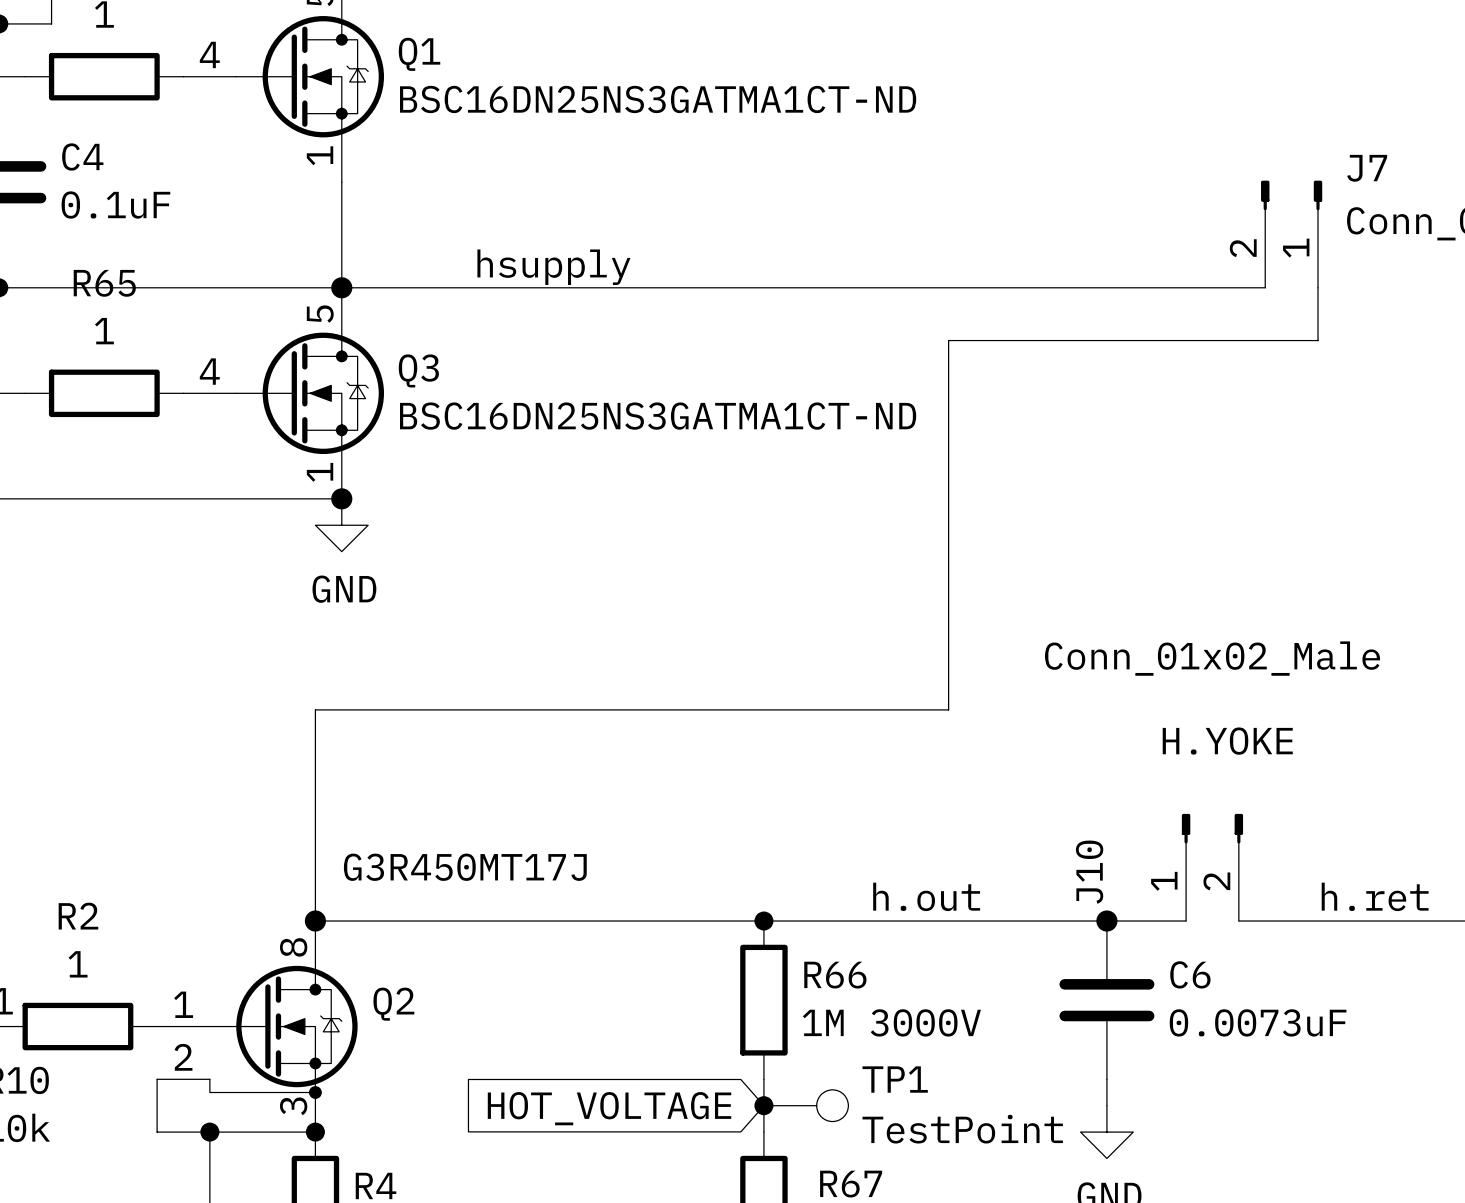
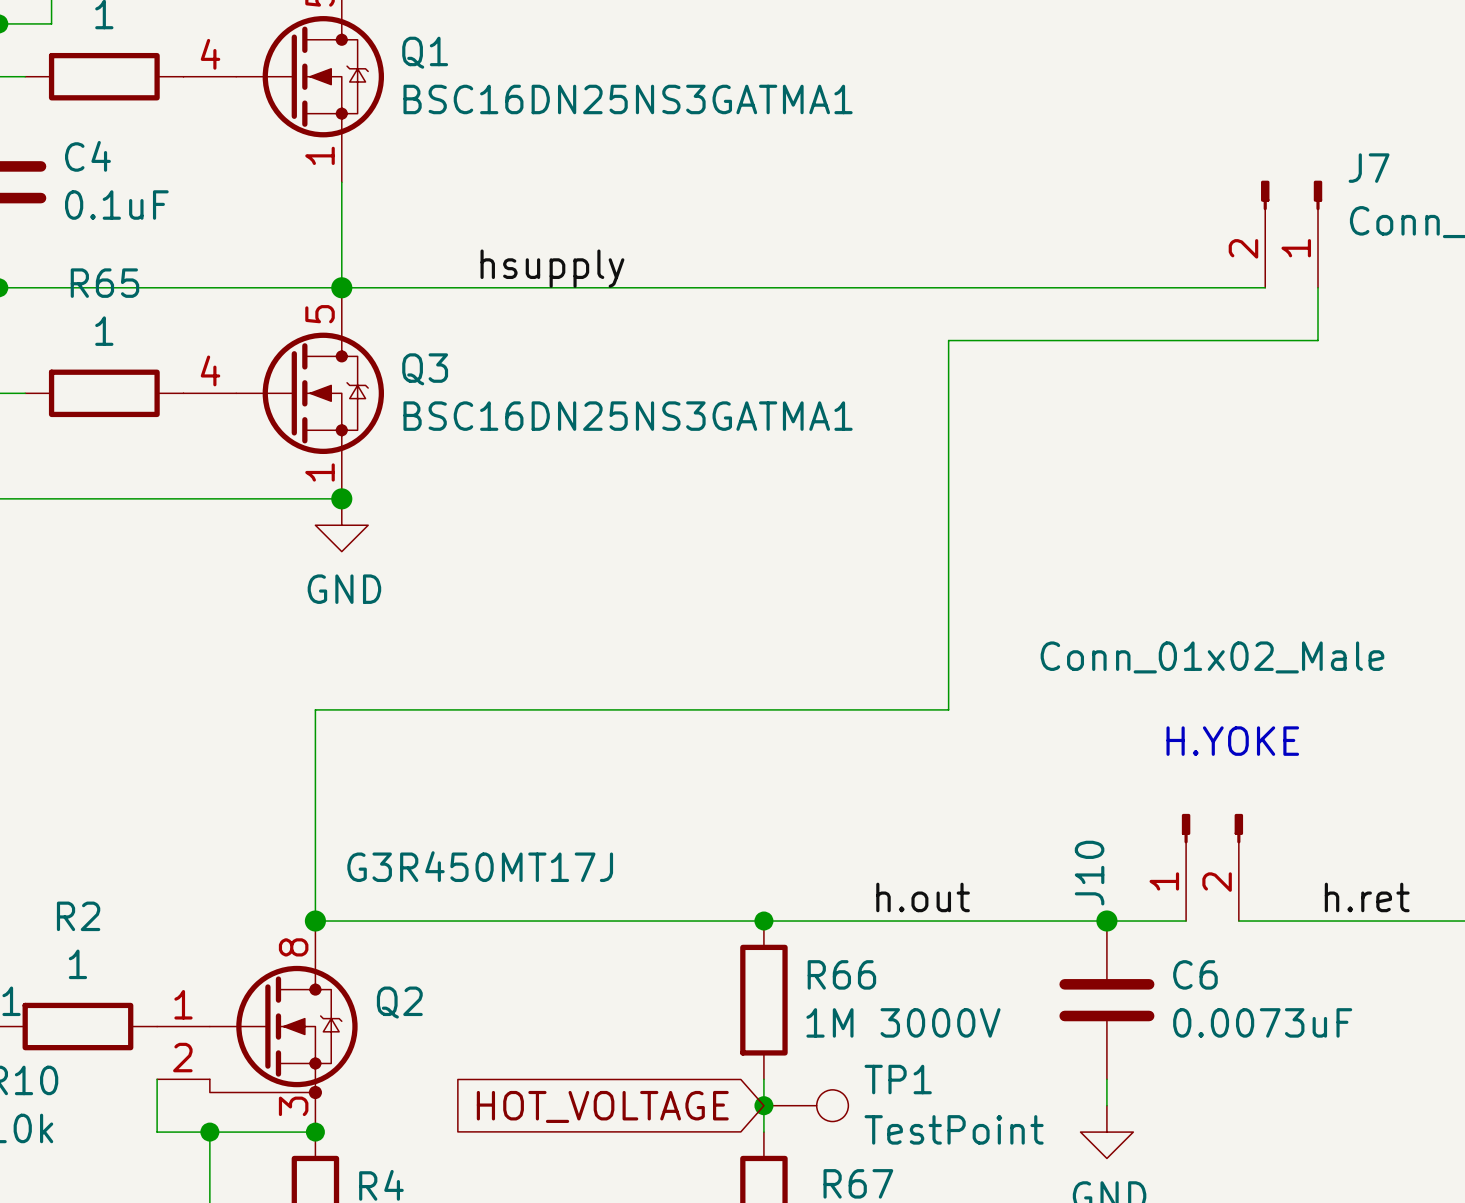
Q1 value: BSC16DN25NS3GATMA1CT-ND (658, 99) -> BSC16DN25NS3GATMA1 (628, 99)
Q3 value: BSC16DN25NS3GATMA1CT-ND (658, 416) -> BSC16DN25NS3GATMA1 (628, 416)

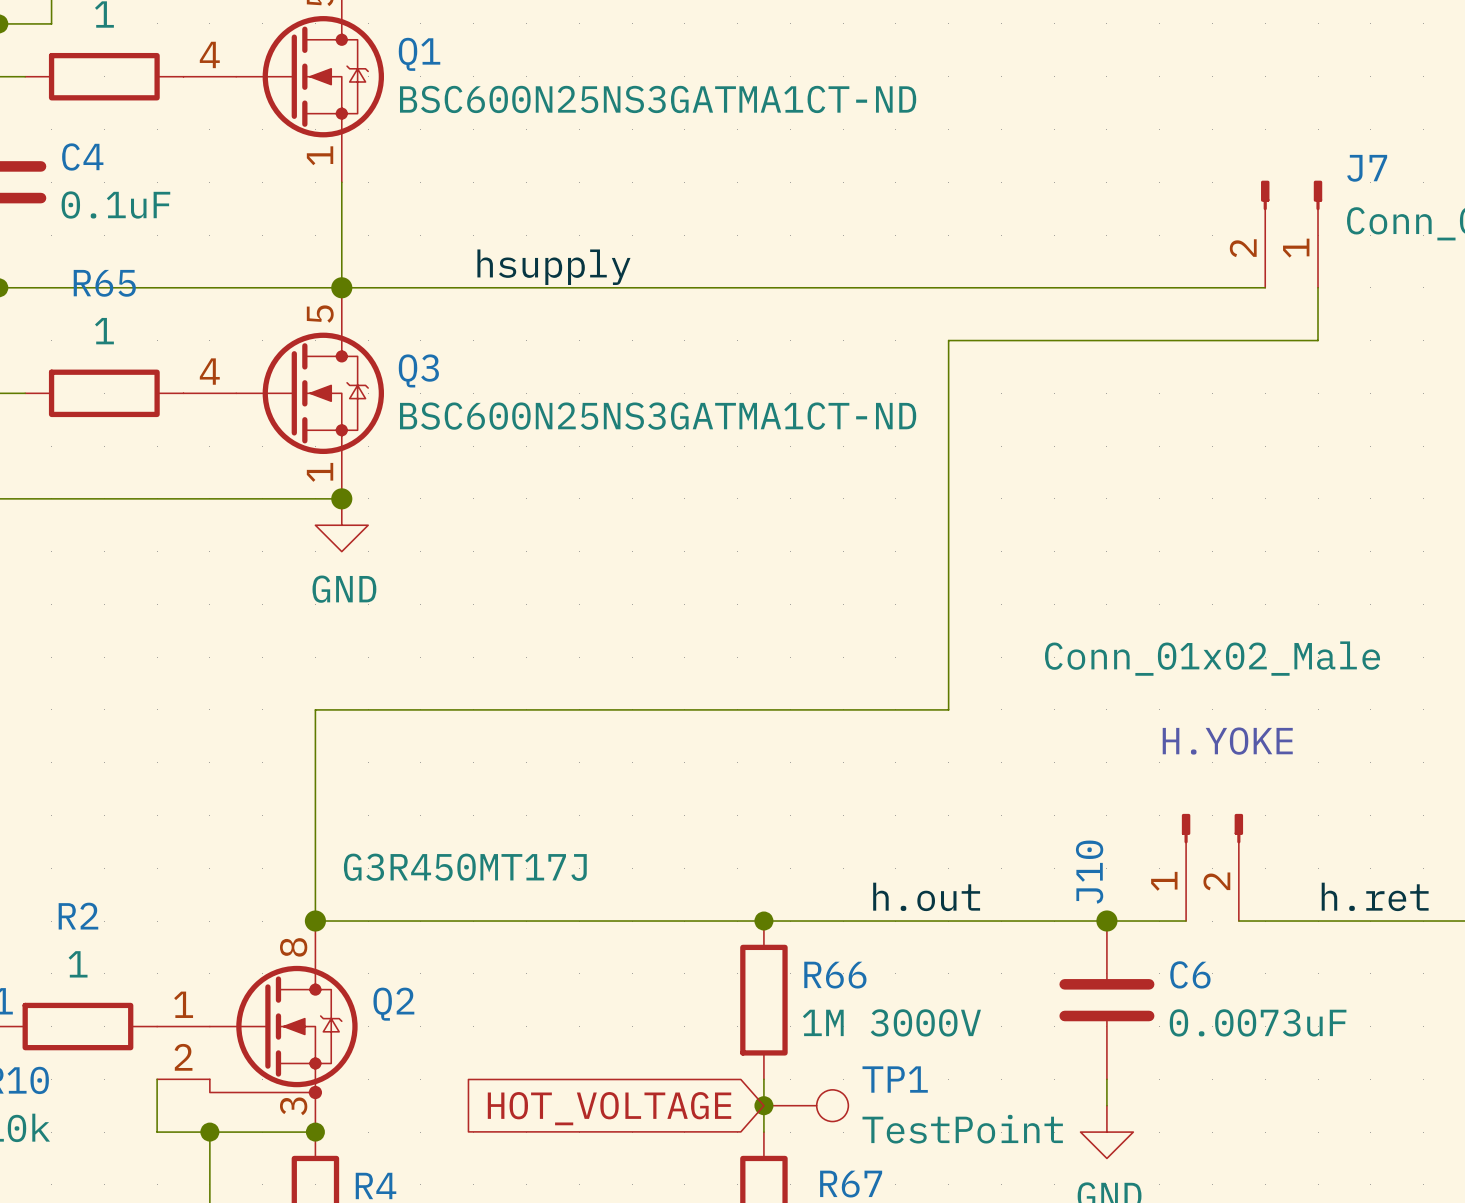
Q1 value: BSC16DN25NS3GATMA1 (628, 99) -> BSC600N25NS3GATMA1CT-ND (658, 99)
Q3 value: BSC16DN25NS3GATMA1 (628, 416) -> BSC600N25NS3GATMA1CT-ND (658, 416)

